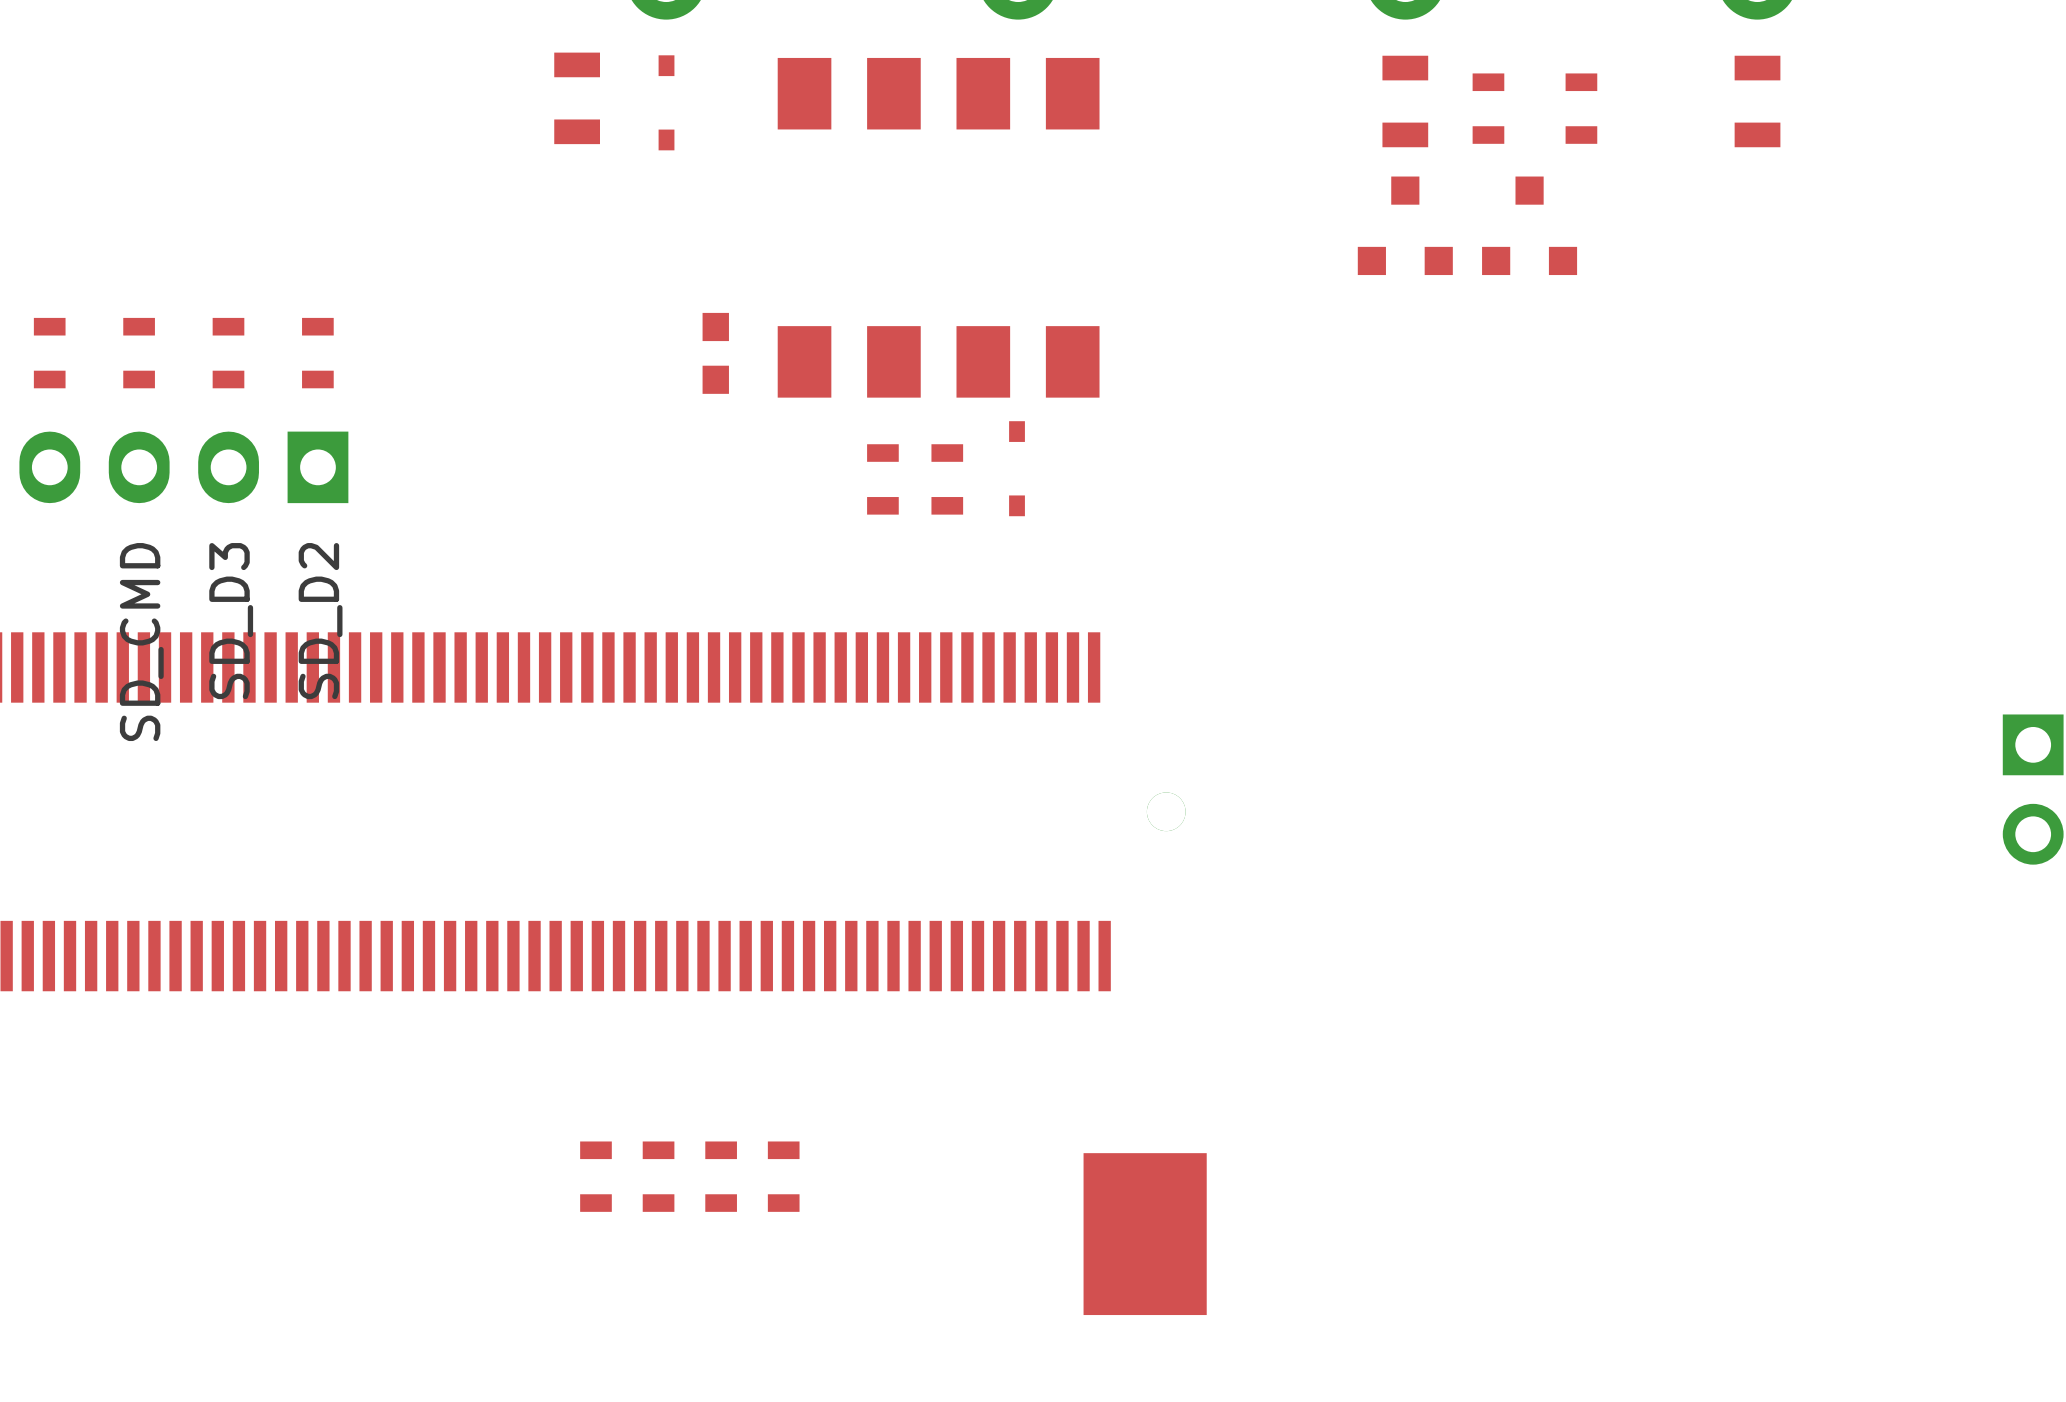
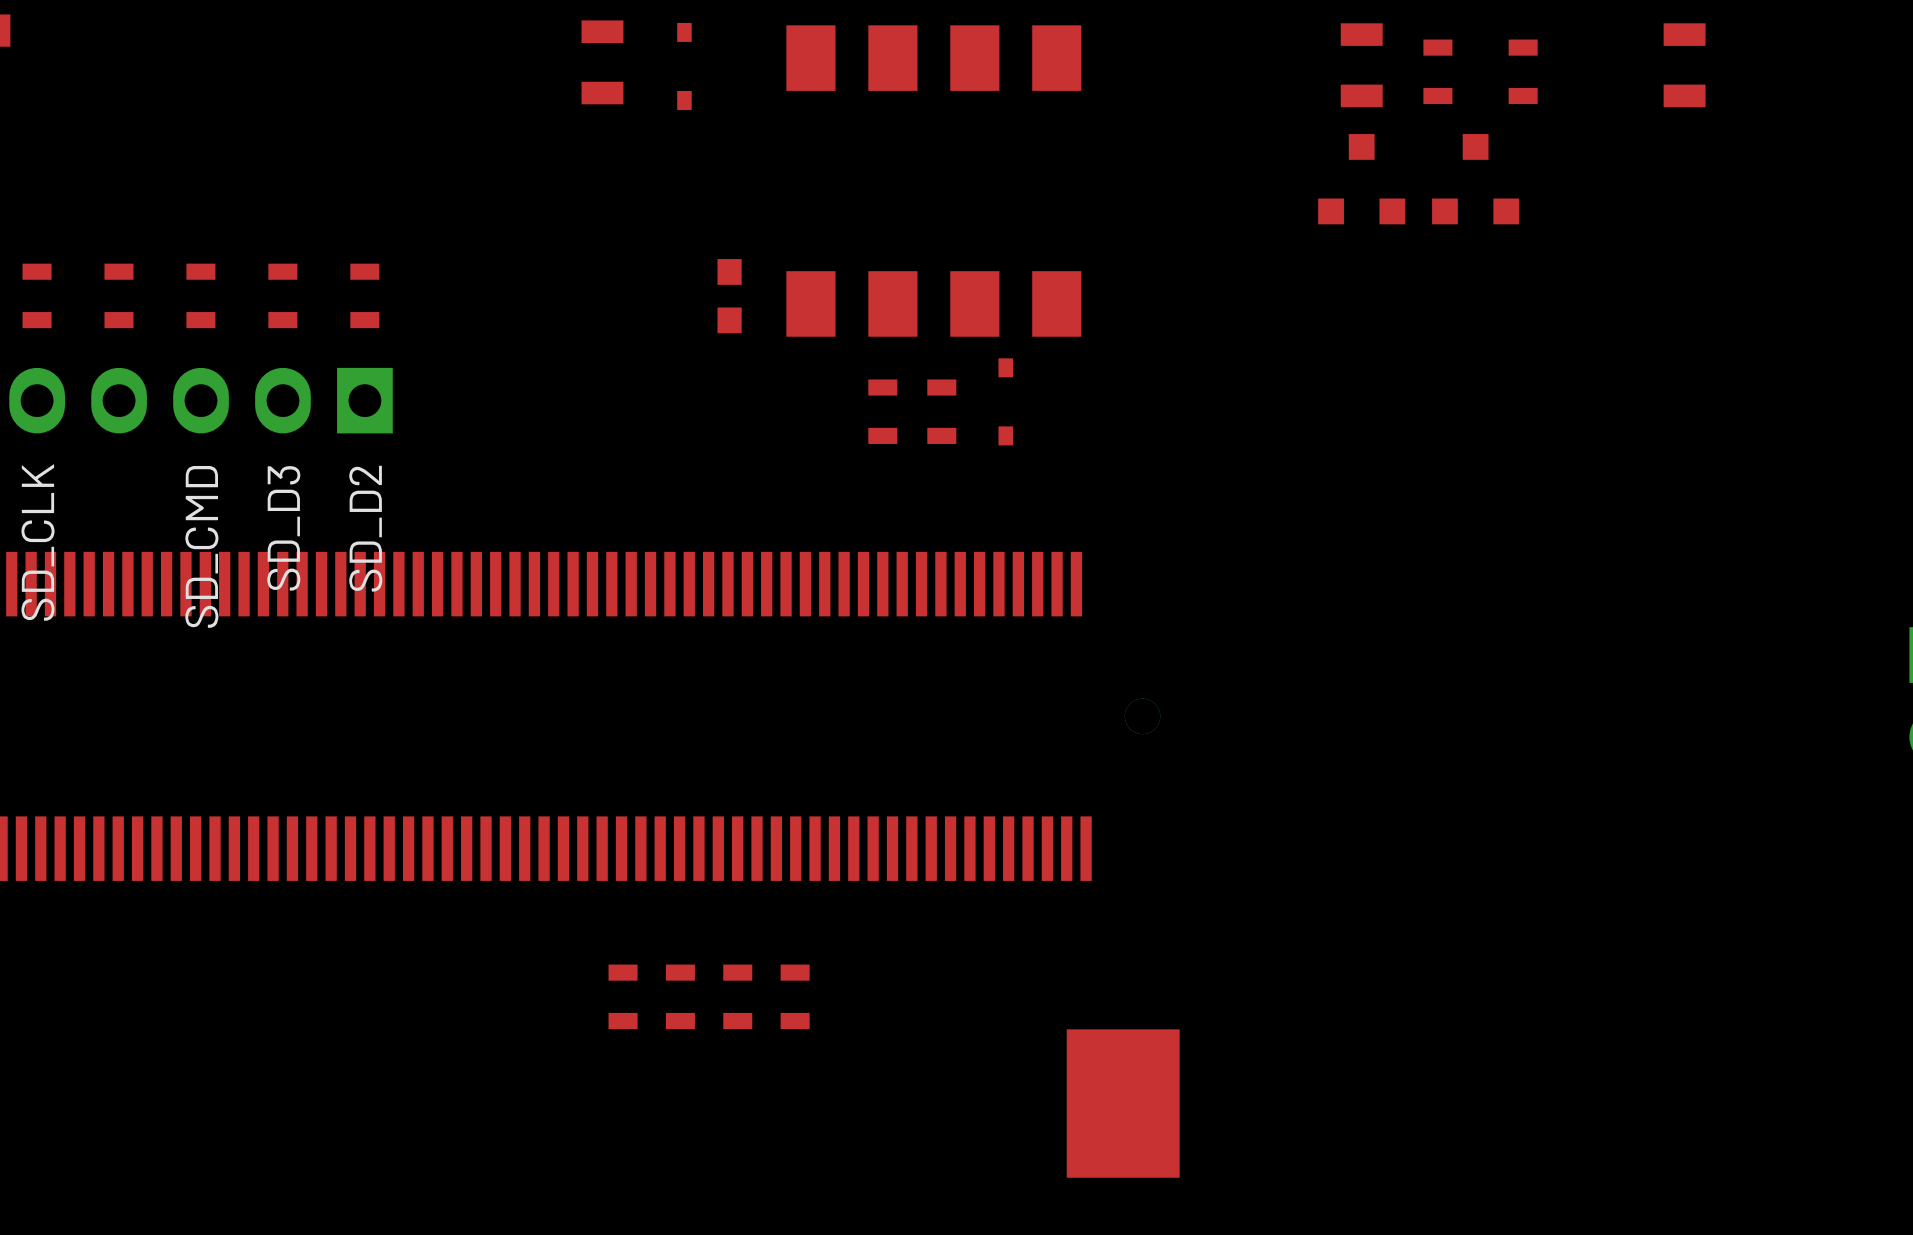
part: none -> (623, 996)
part: none -> (680, 996)
part: none -> (737, 996)
part: none -> (795, 996)
part: (595, 1176) -> none
part: (658, 1176) -> none
part: (721, 1176) -> none
part: (783, 1176) -> none

